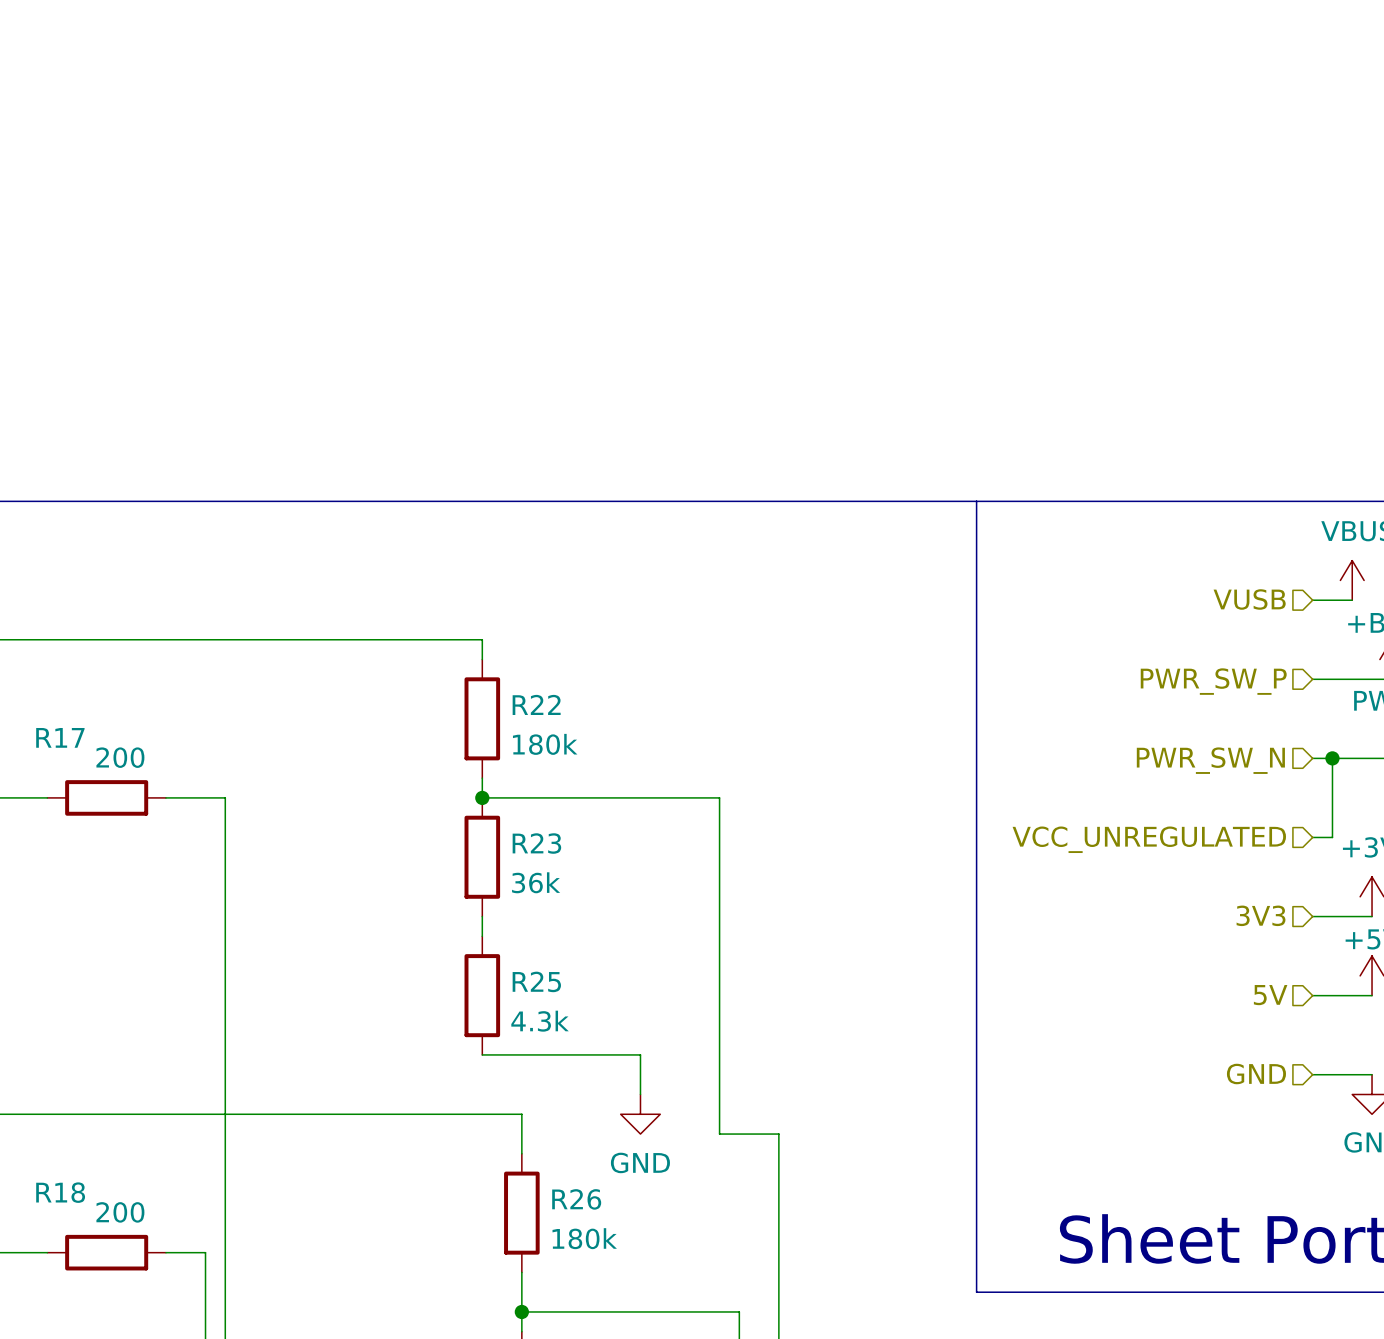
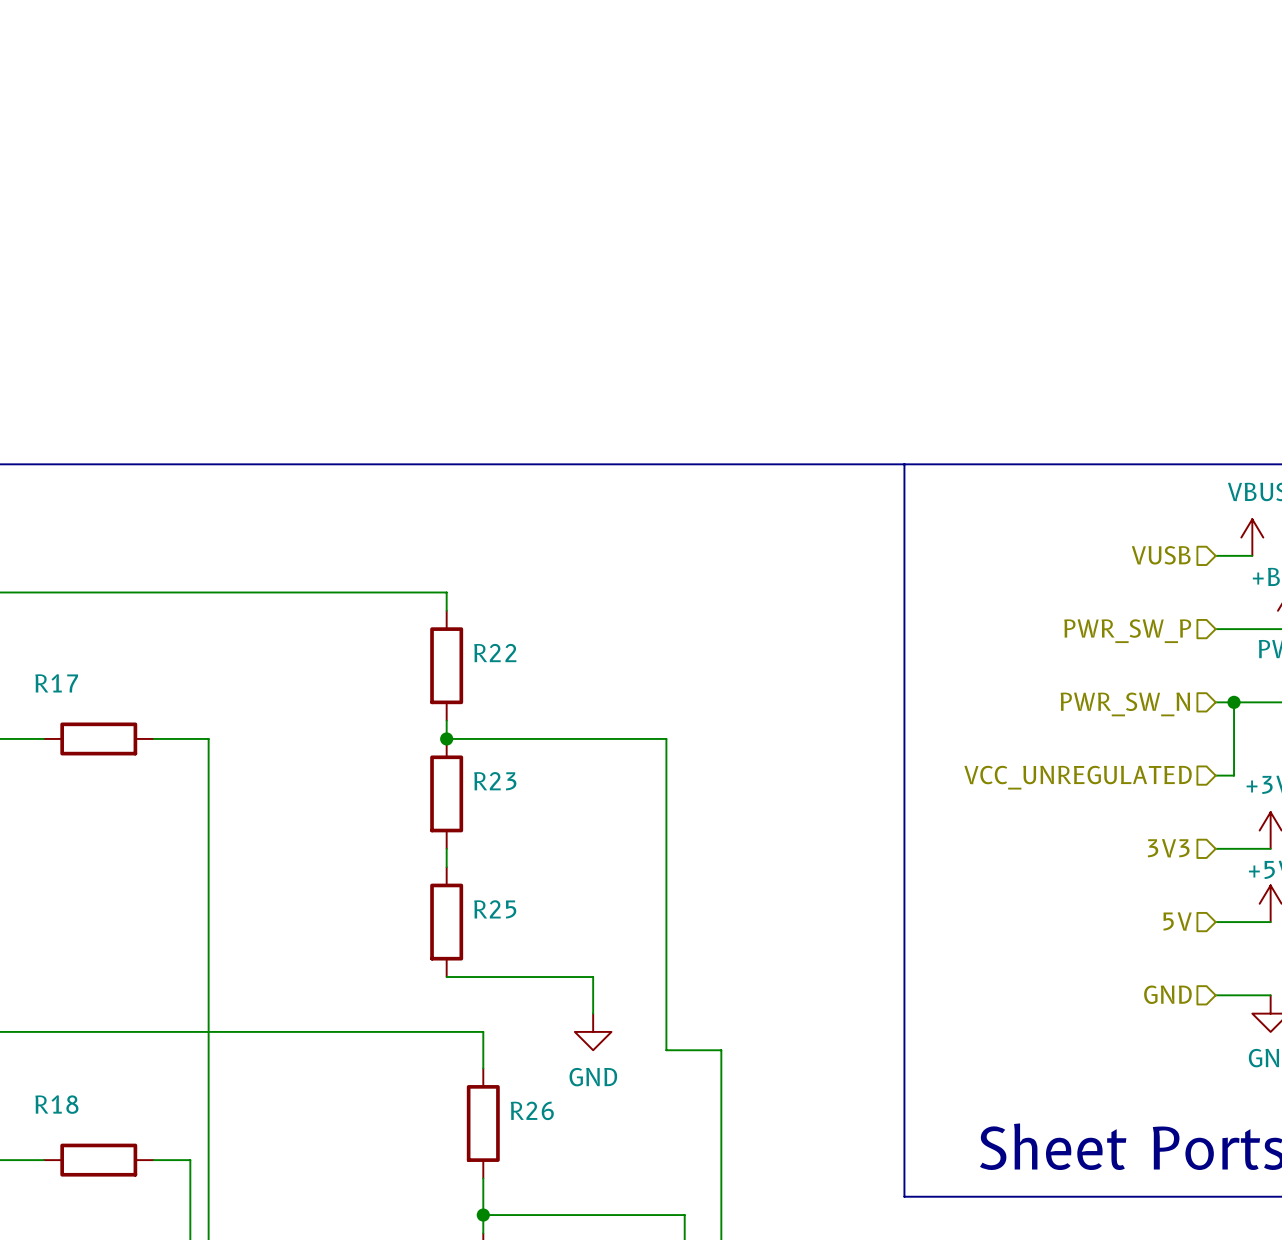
R22 value: 180k (545, 744) -> none
R17 value: 200 (120, 757) -> none
R23 value: 36k (536, 882) -> none
R25 value: 4.3k (540, 1021) -> none
R18 value: 200 (120, 1212) -> none
R26 value: 180k (584, 1238) -> none

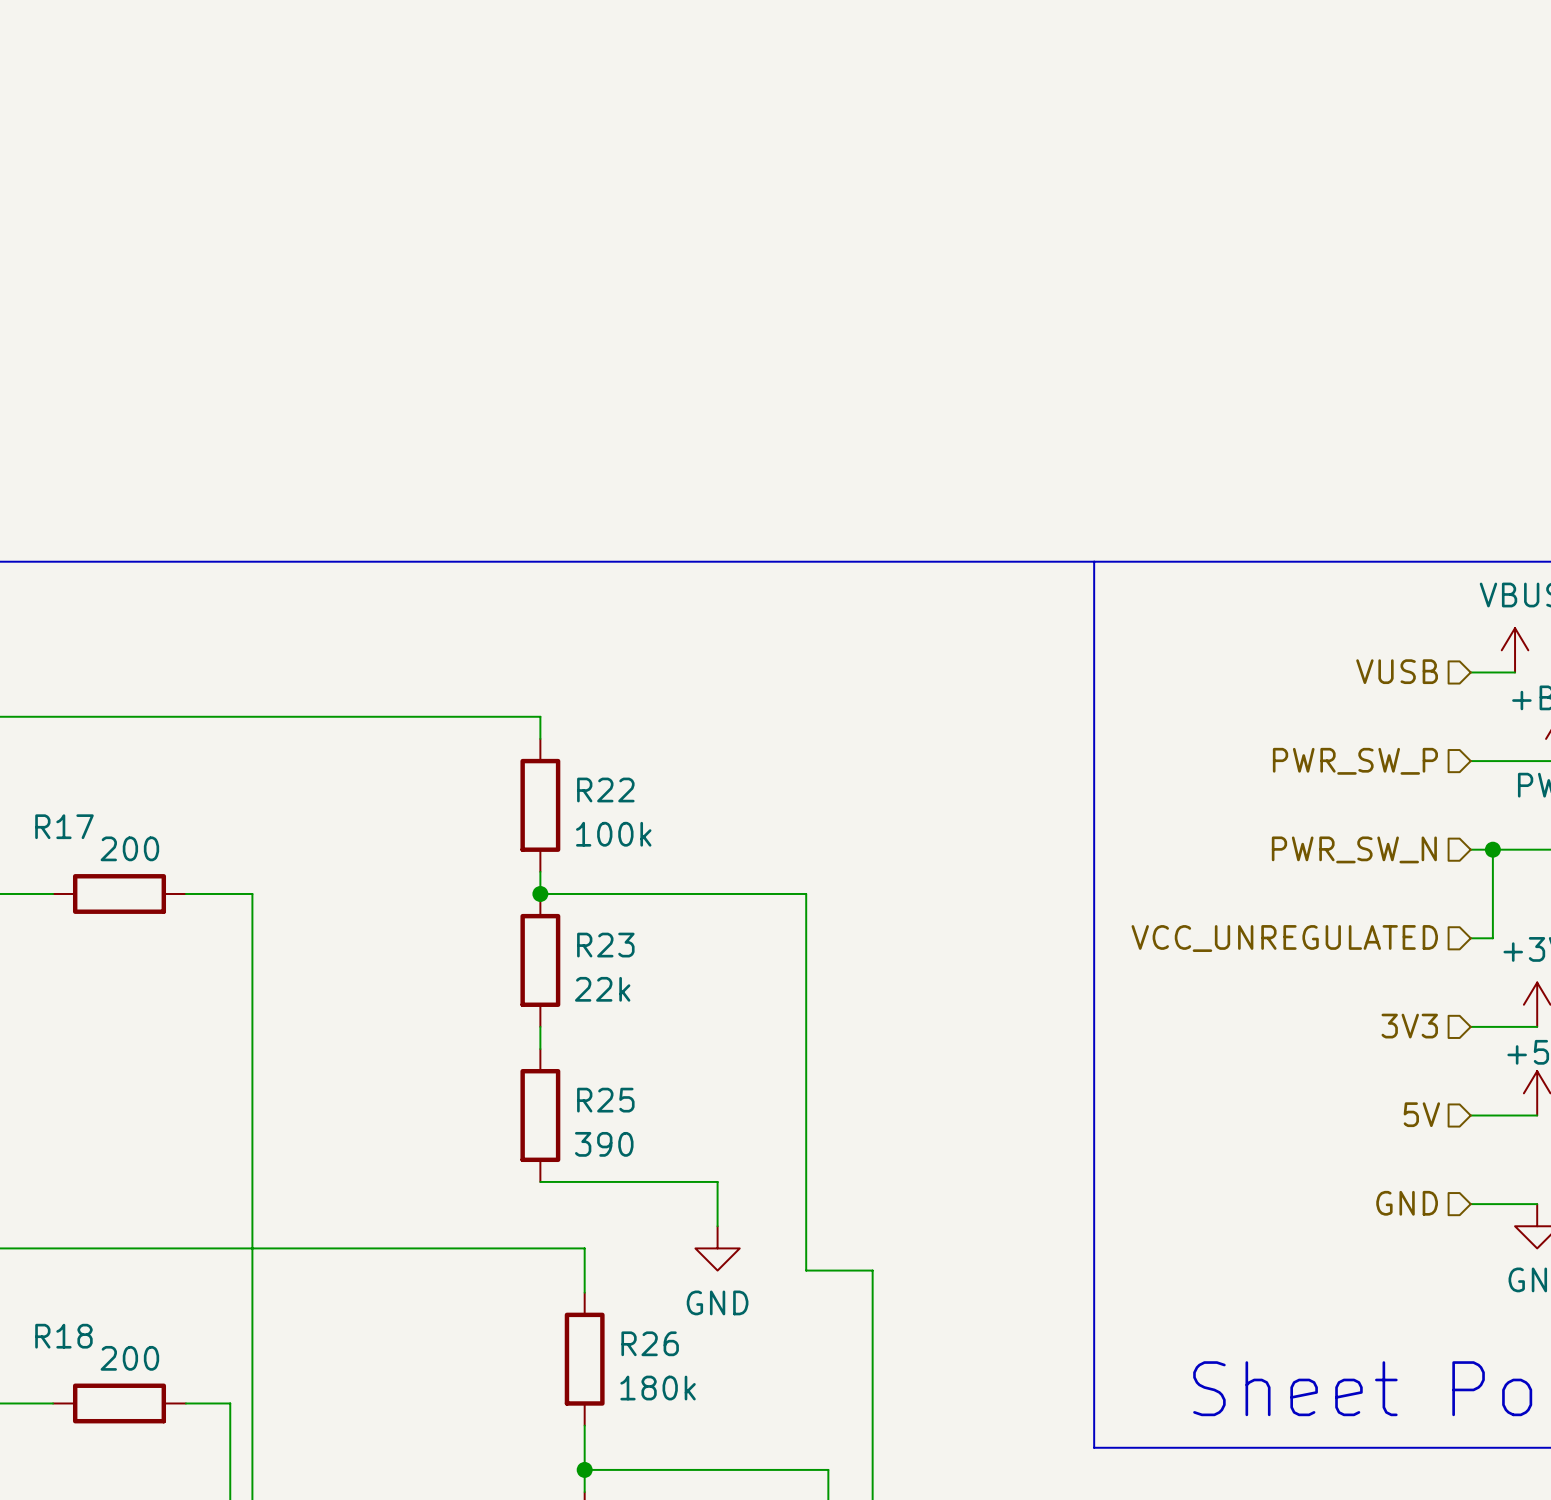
R22 value: none -> 100k (613, 834)
R17 value: none -> 200 (129, 848)
R23 value: none -> 22k (602, 989)
R25 value: none -> 390 (604, 1144)
R18 value: none -> 200 (129, 1358)
R26 value: none -> 180k (658, 1388)

